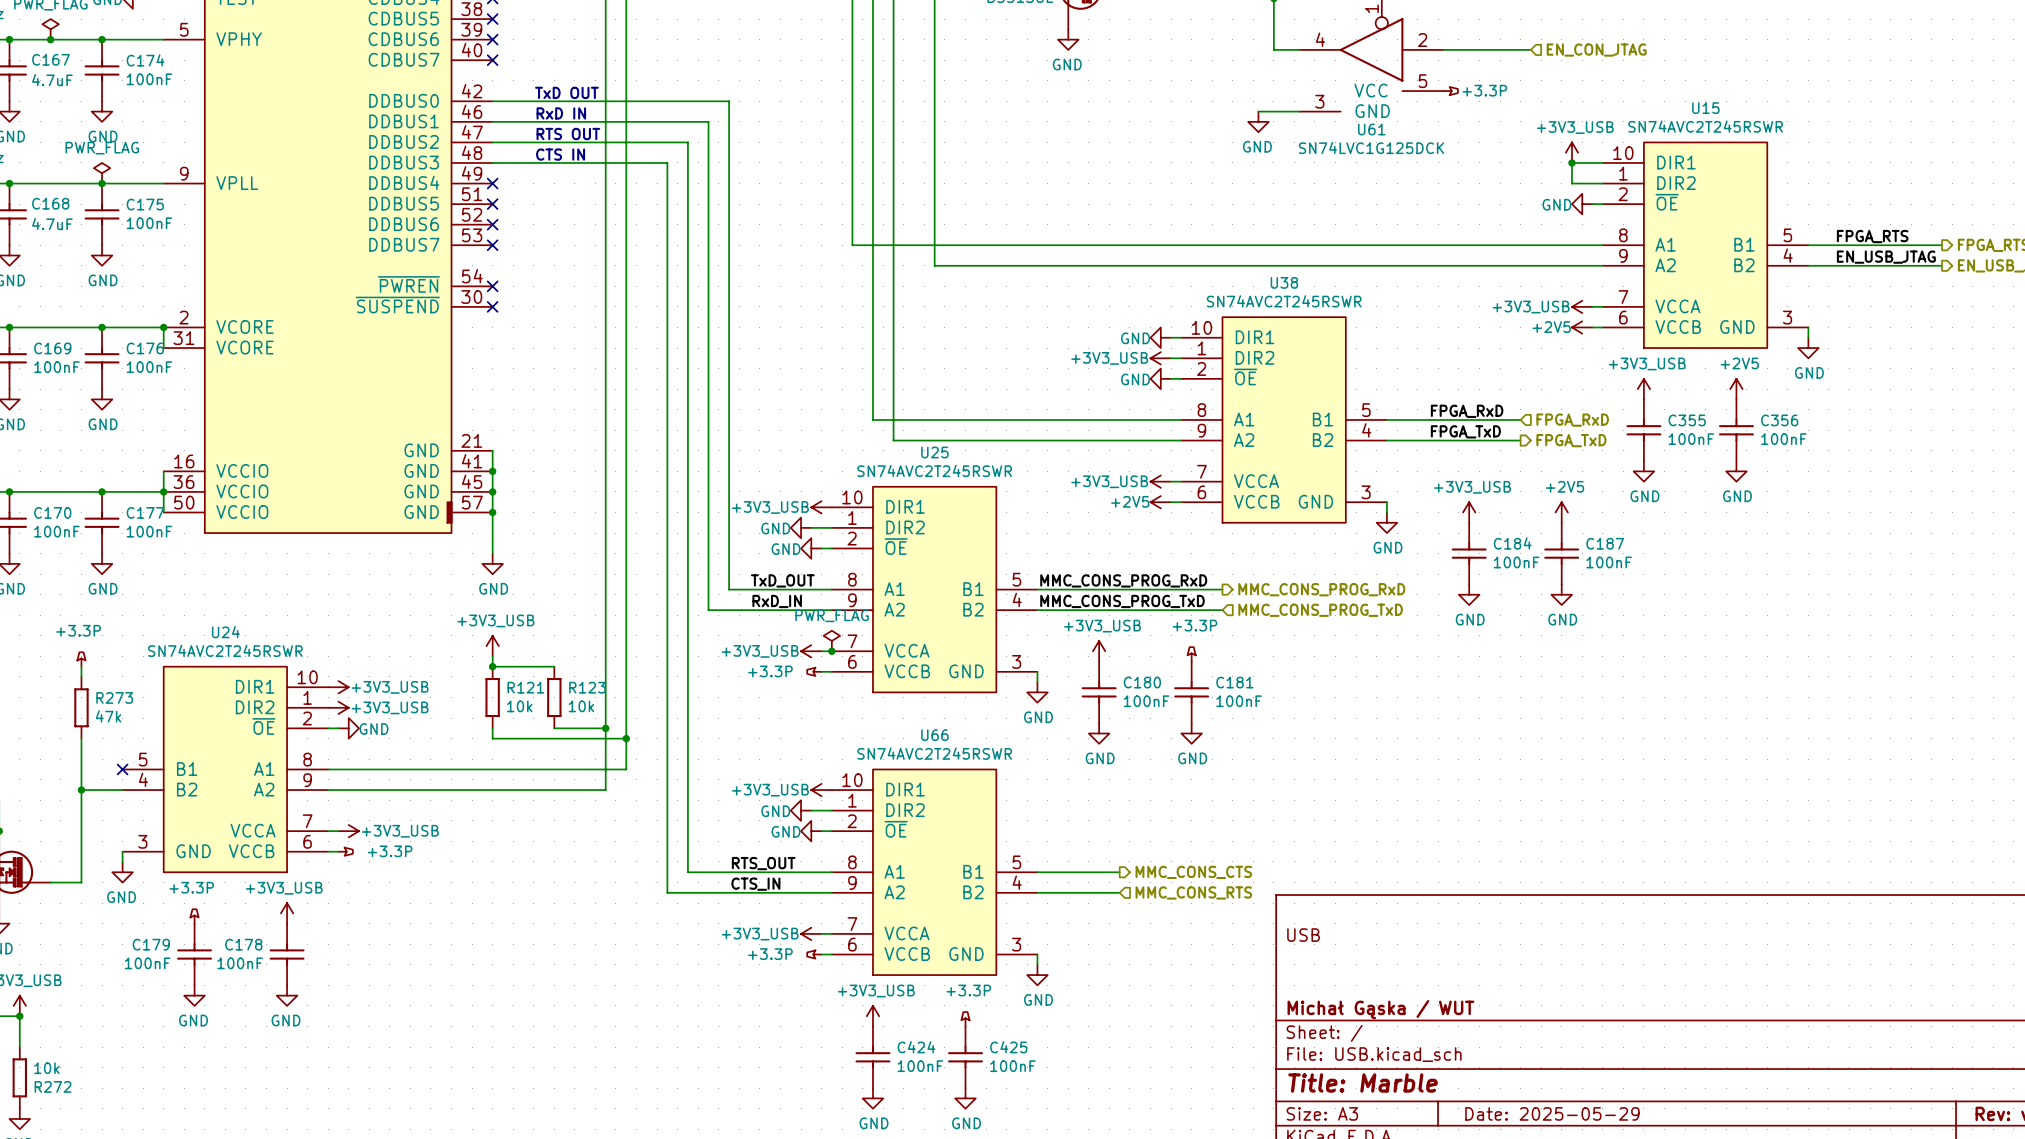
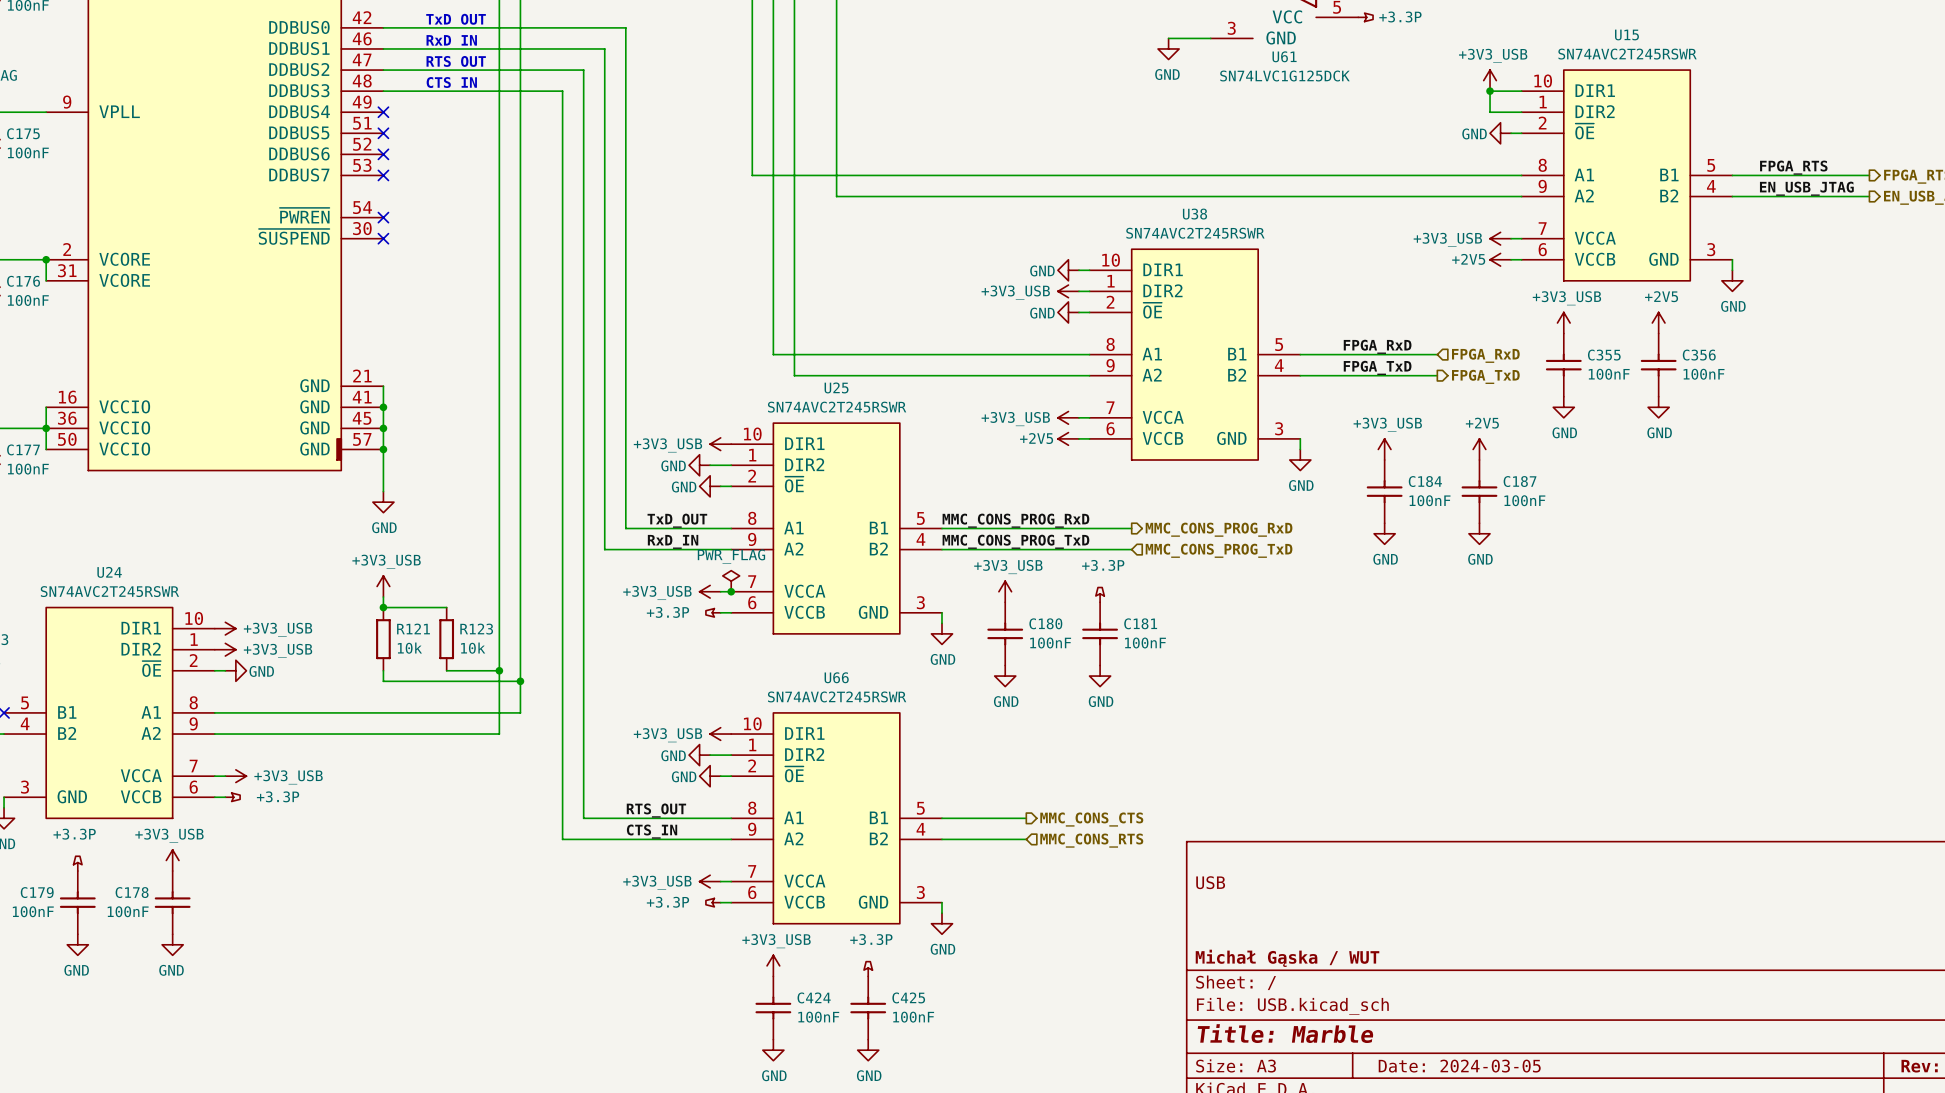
title block: Date: 2025-05-29 (1552, 1113) -> Date: 2024-03-05 (1459, 1066)

